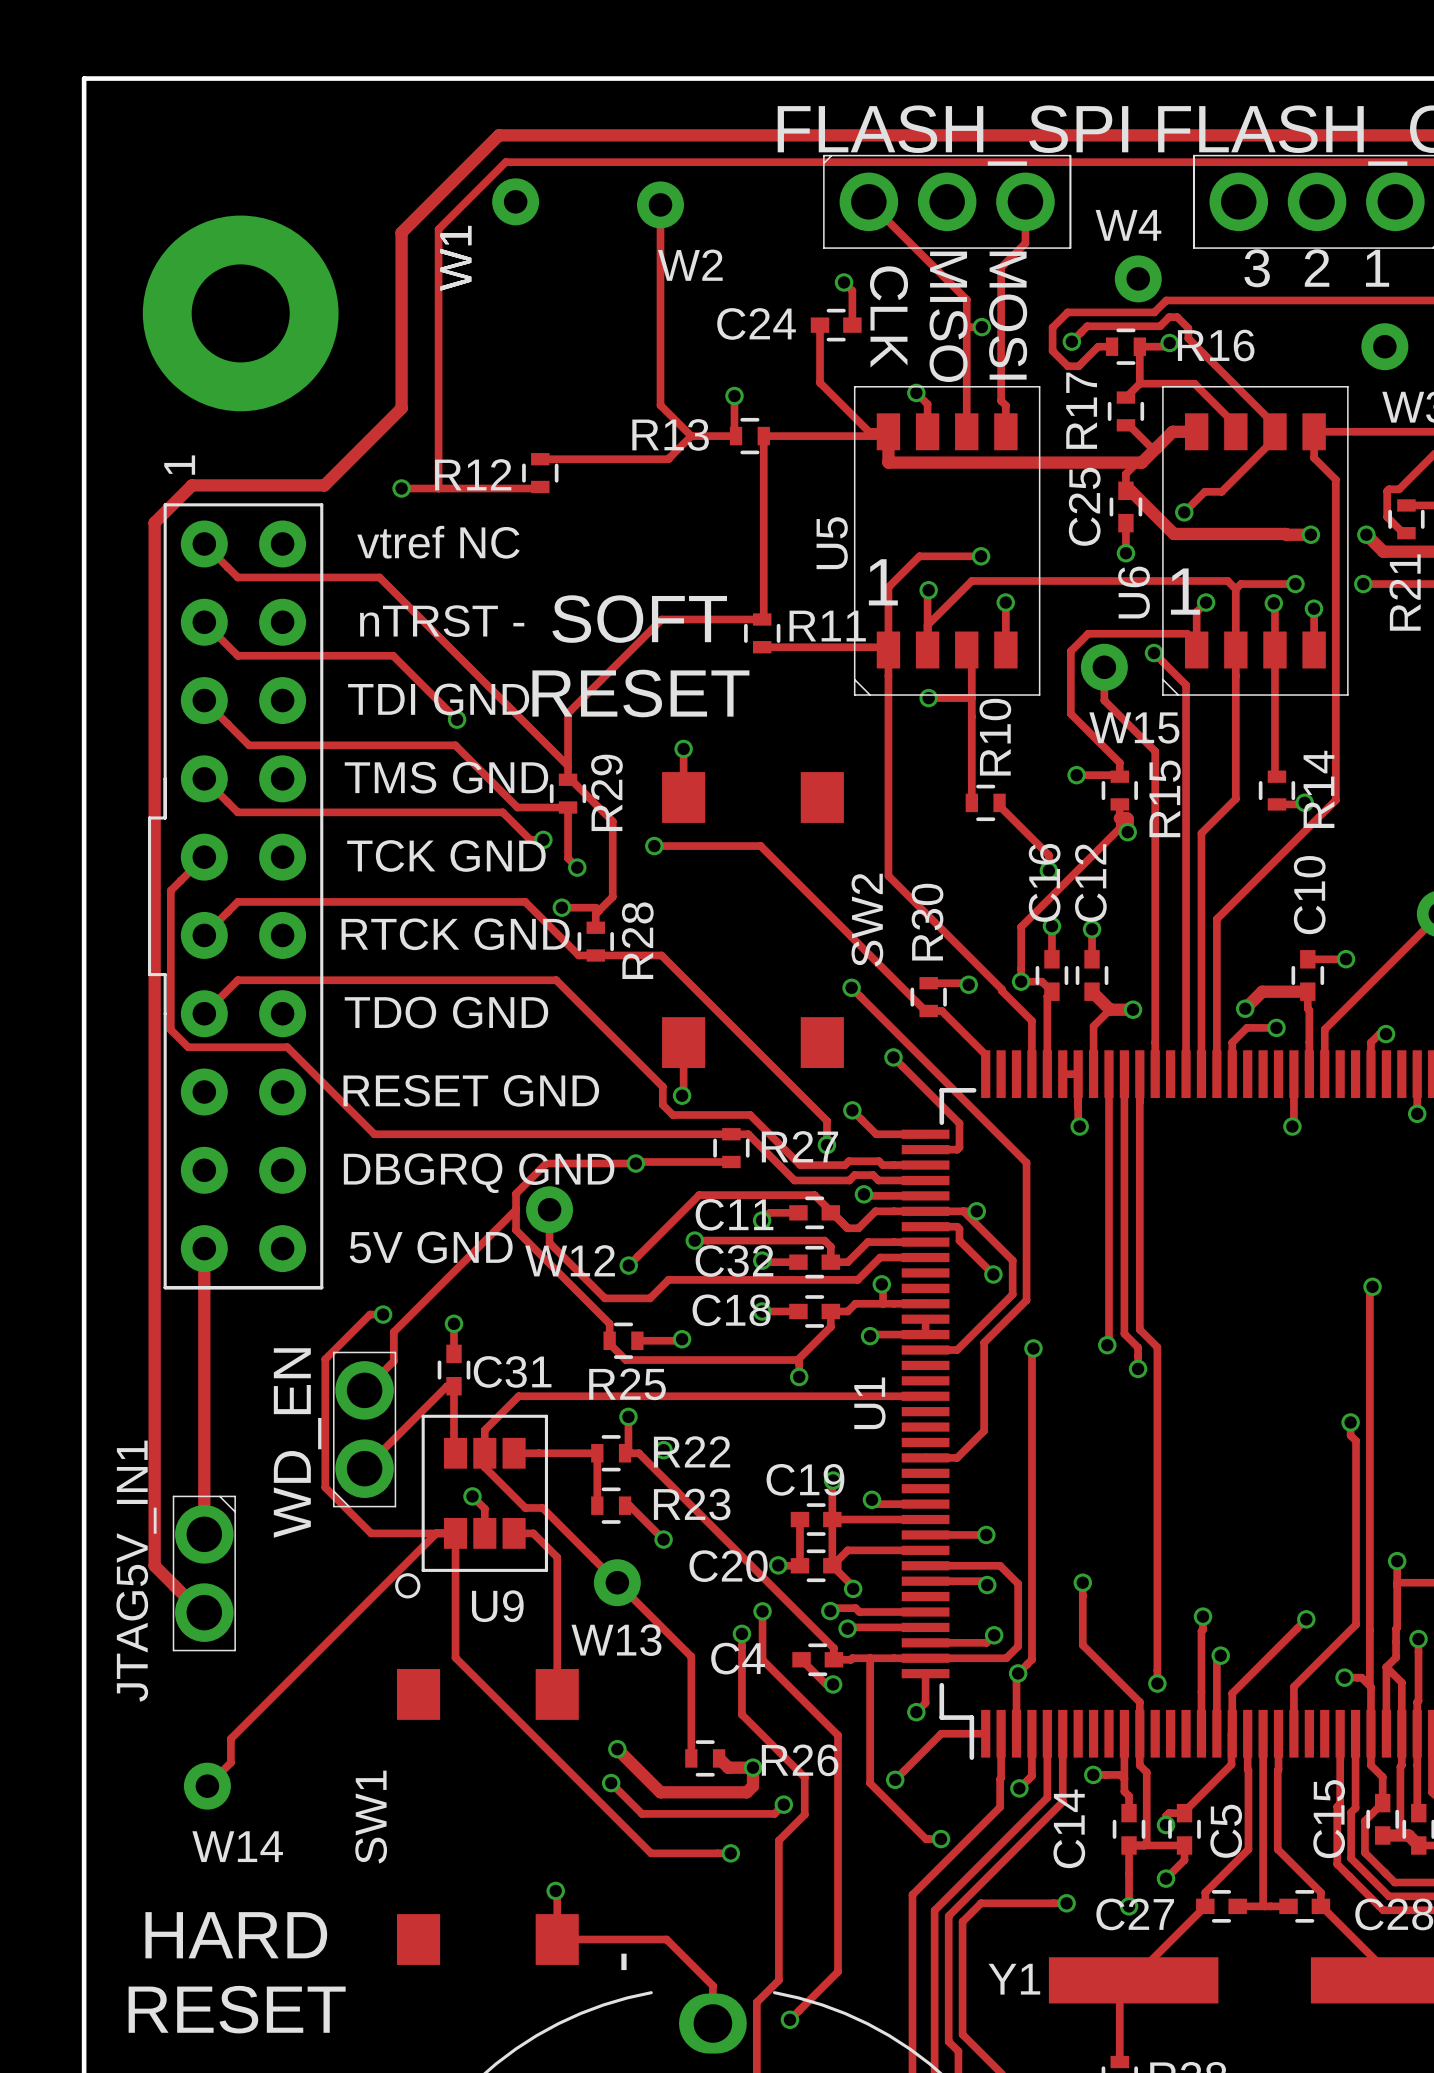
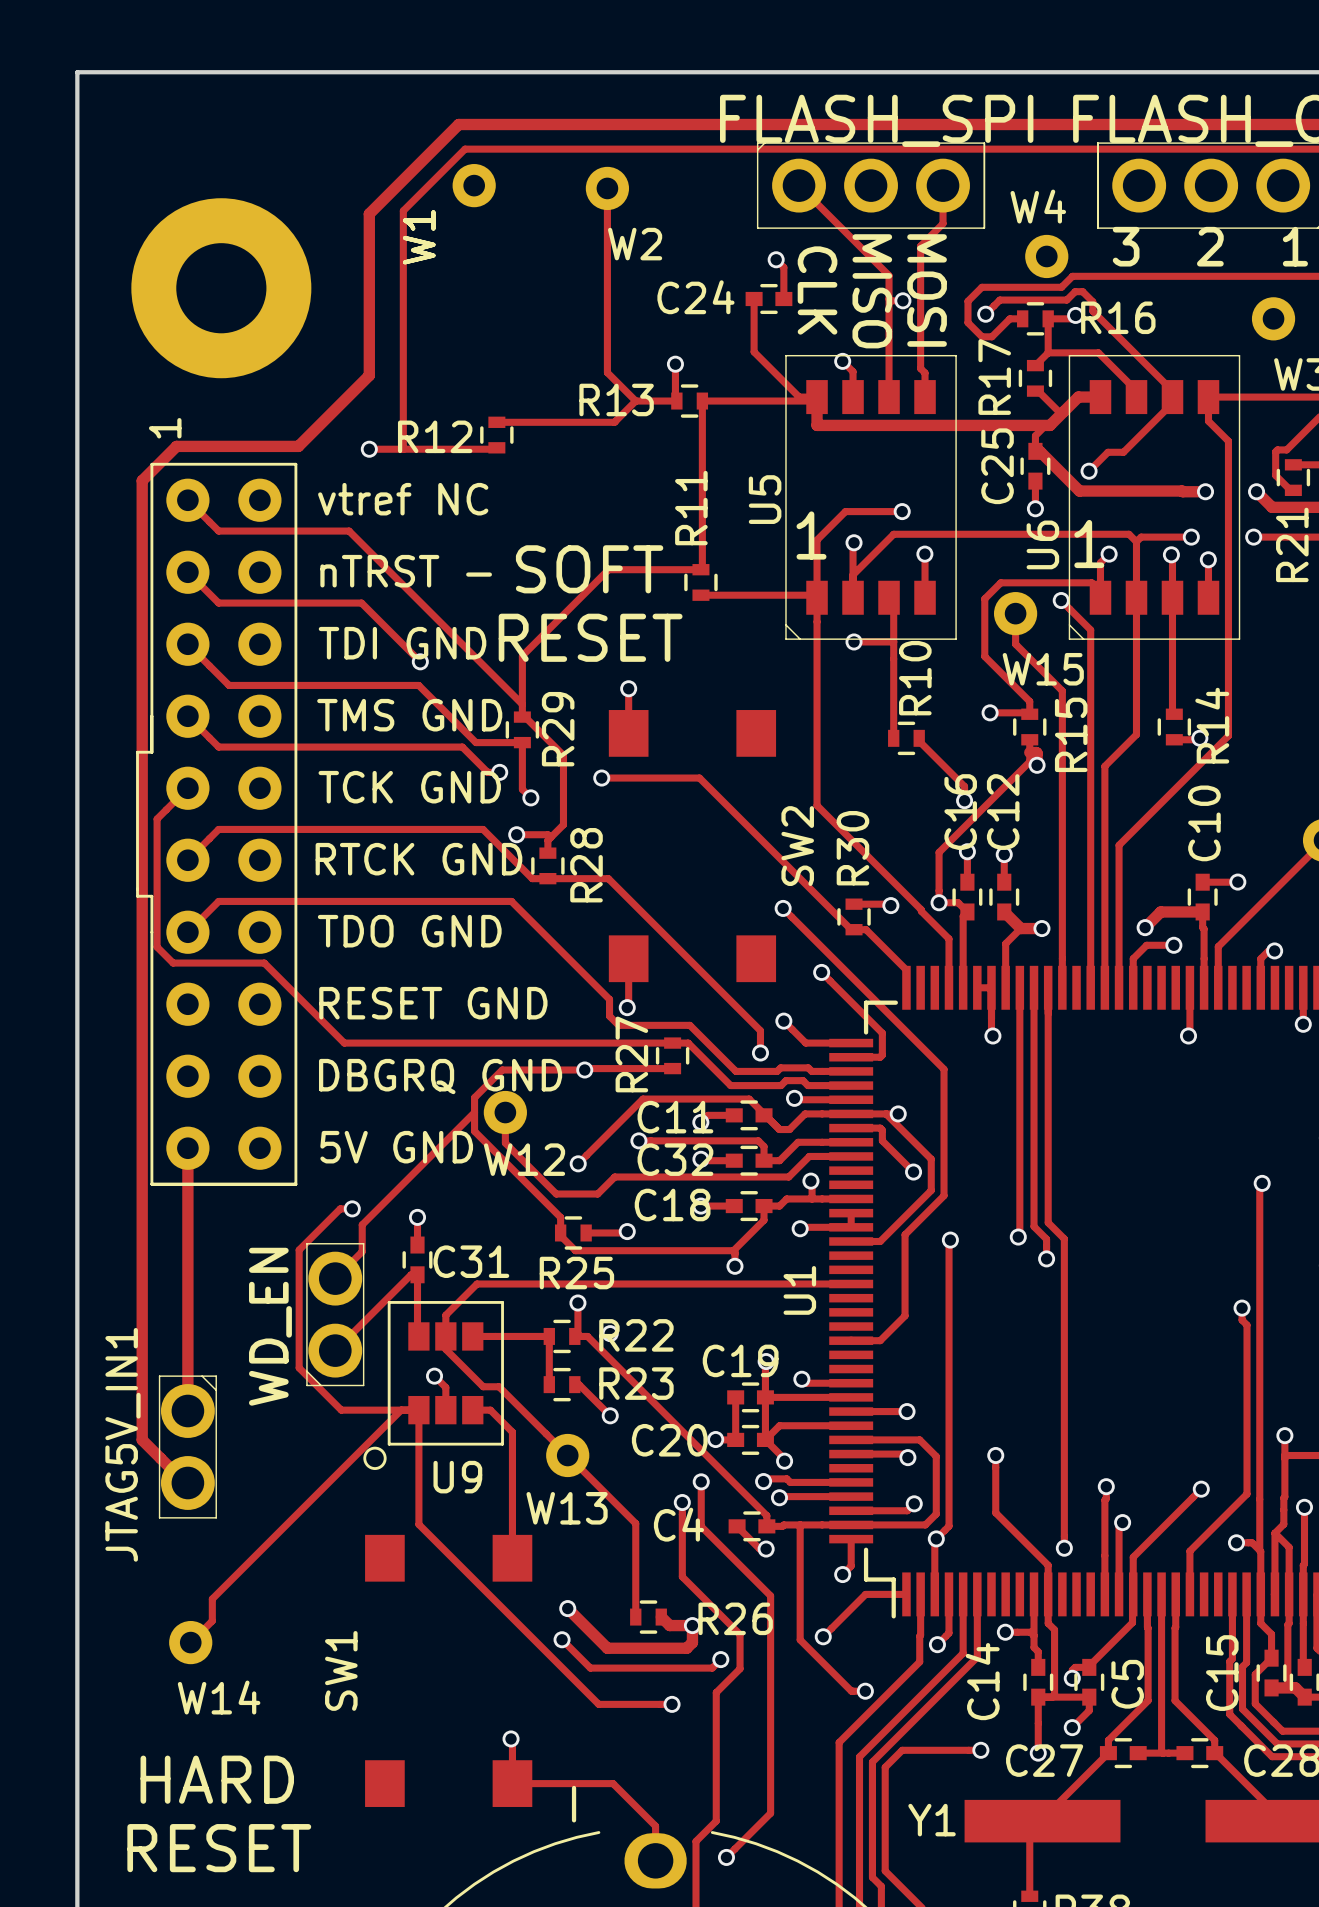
R11 name rotation: 0° (827, 626) -> 90° counterclockwise (691, 508)
R27 name rotation: 0° (799, 1146) -> 90° counterclockwise (631, 1054)
R27 name position: R27 (799, 1146) -> R27 (631, 1054)

